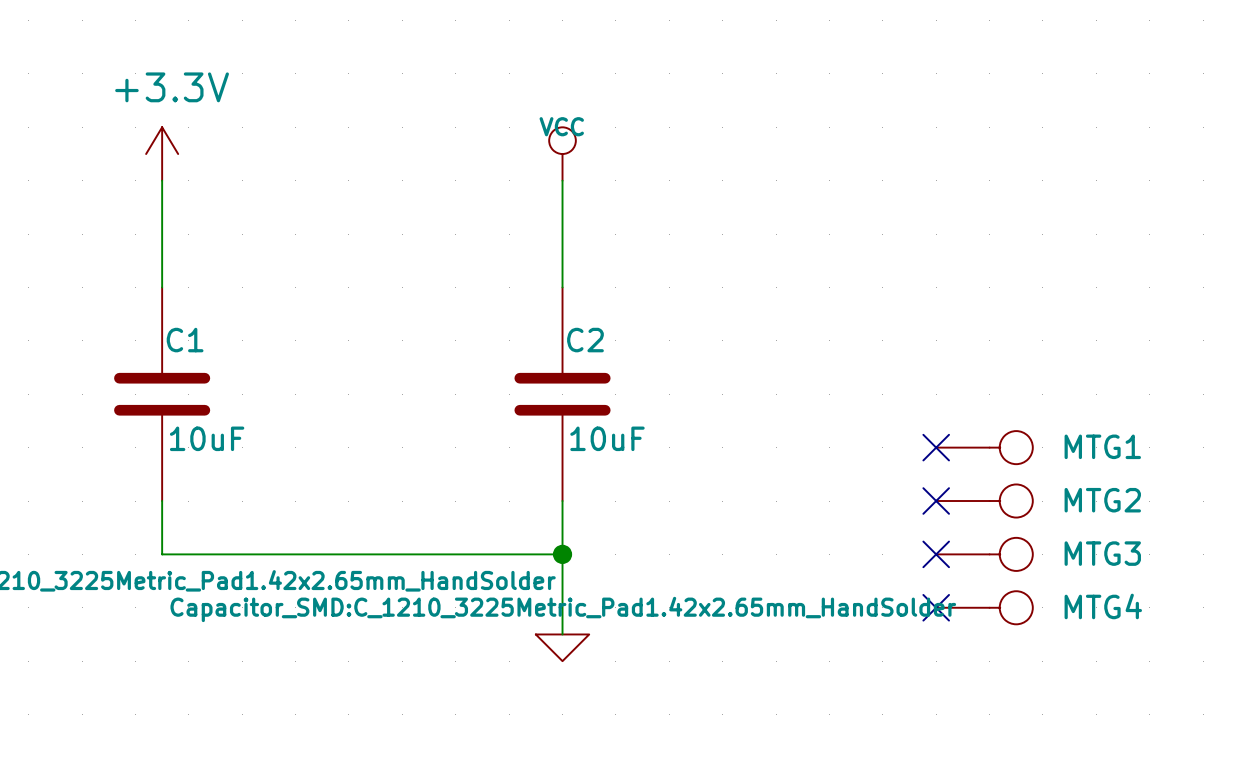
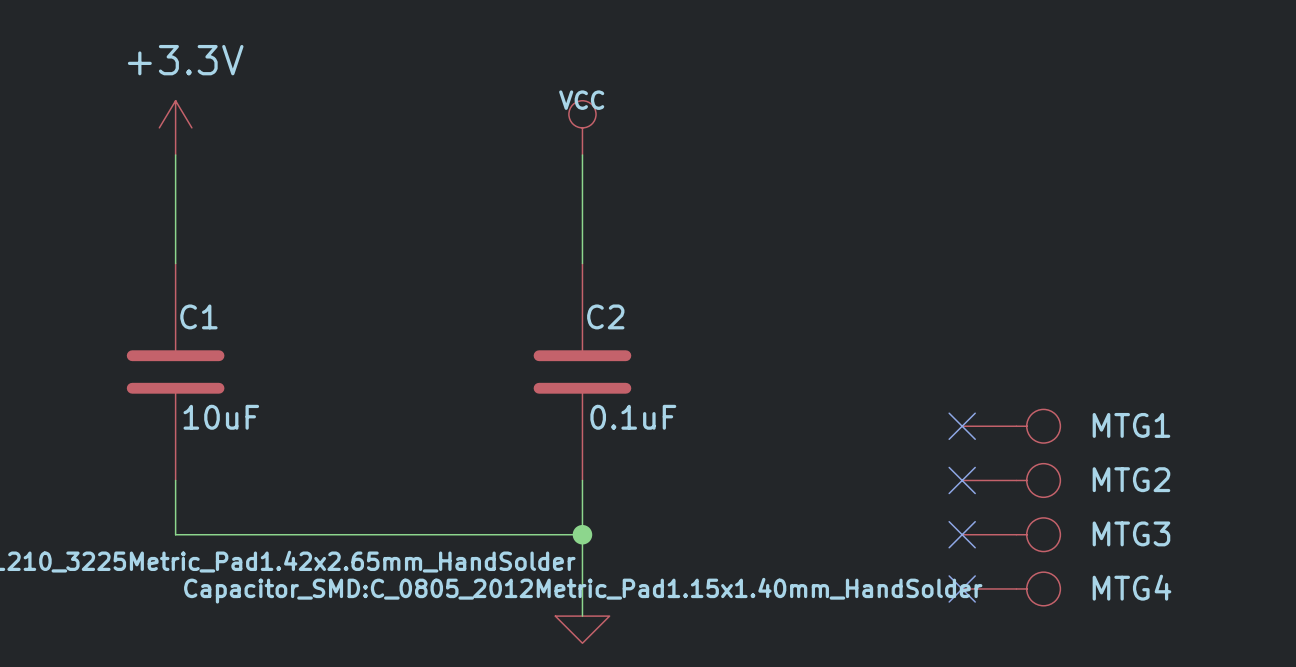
C2 value: 10uF (607, 438) -> 0.1uF (633, 417)
C2 text: Capacitor_SMD:C_1210_3225Metric_Pad1.42x2.65mm_HandSolder (563, 609) -> Capacitor_SMD:C_0805_2012Metric_Pad1.15x1.40mm_HandSolder (583, 590)

